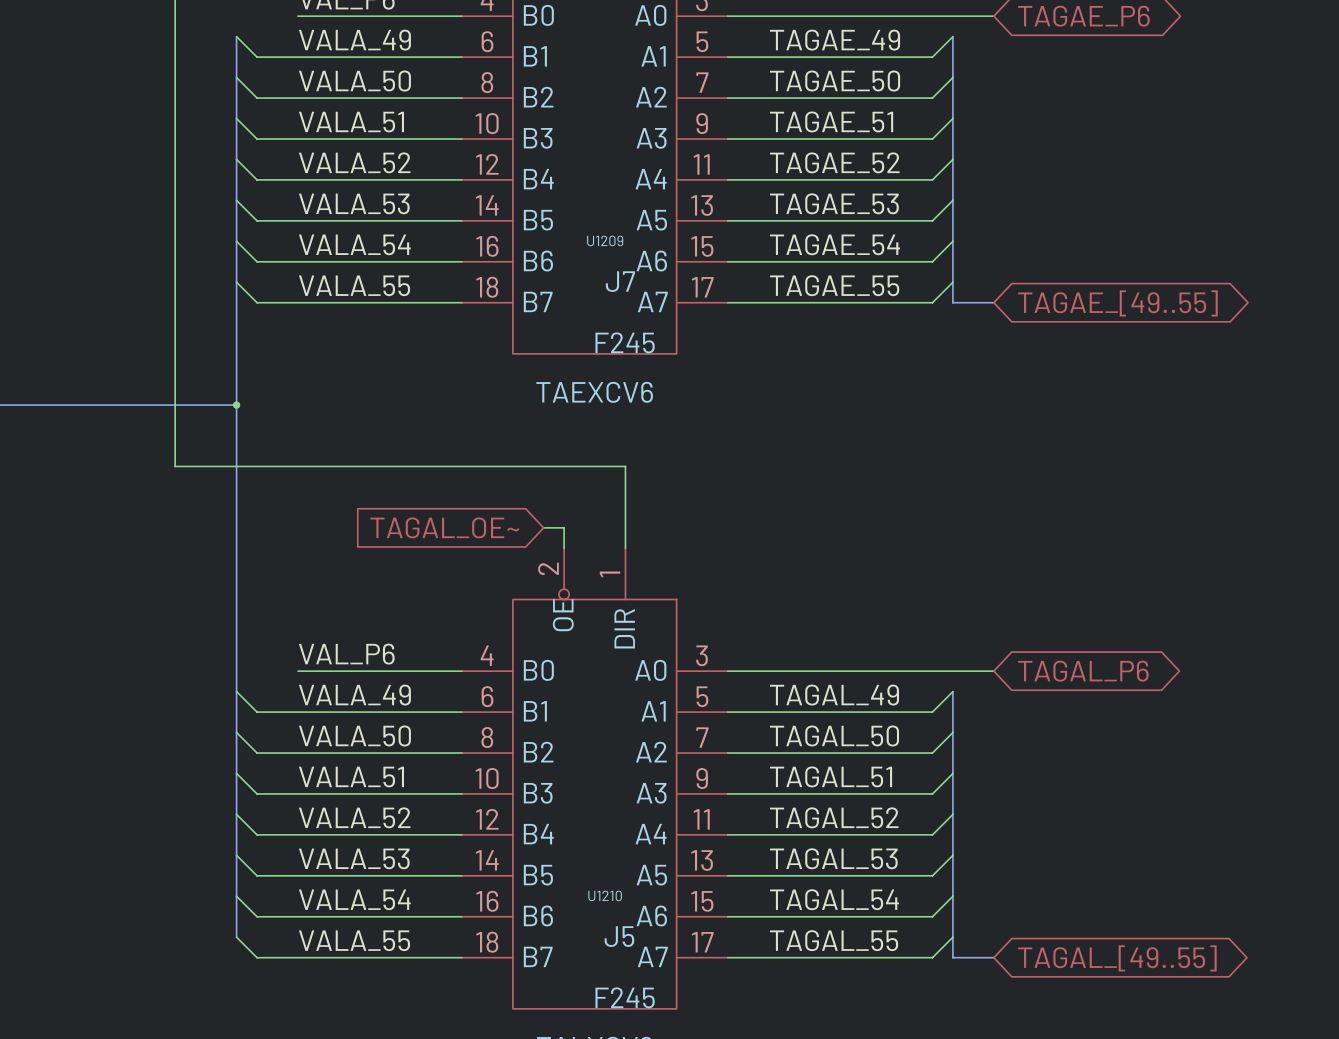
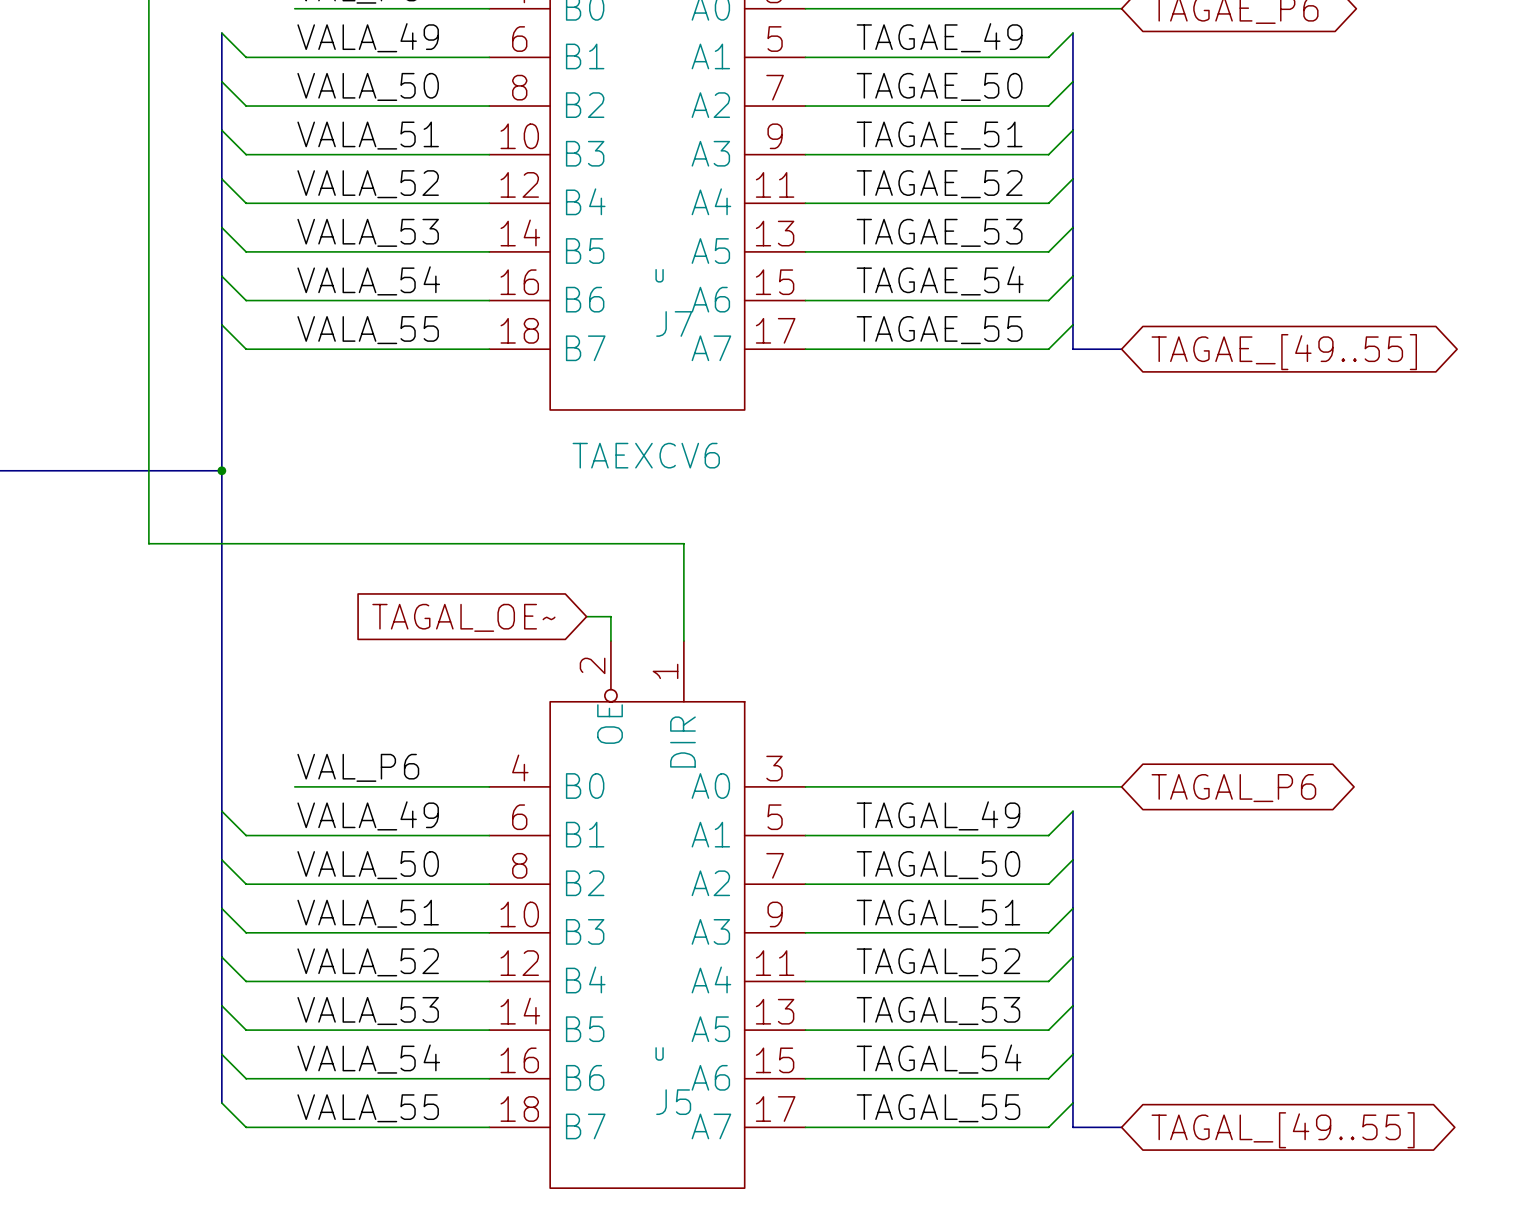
U1209 name: U1209 (605, 240) -> U (659, 275)
U1209 value: F245 (625, 342) -> none
U1210 name: U1210 (605, 895) -> U (659, 1053)
U1210 value: F245 (625, 997) -> none

